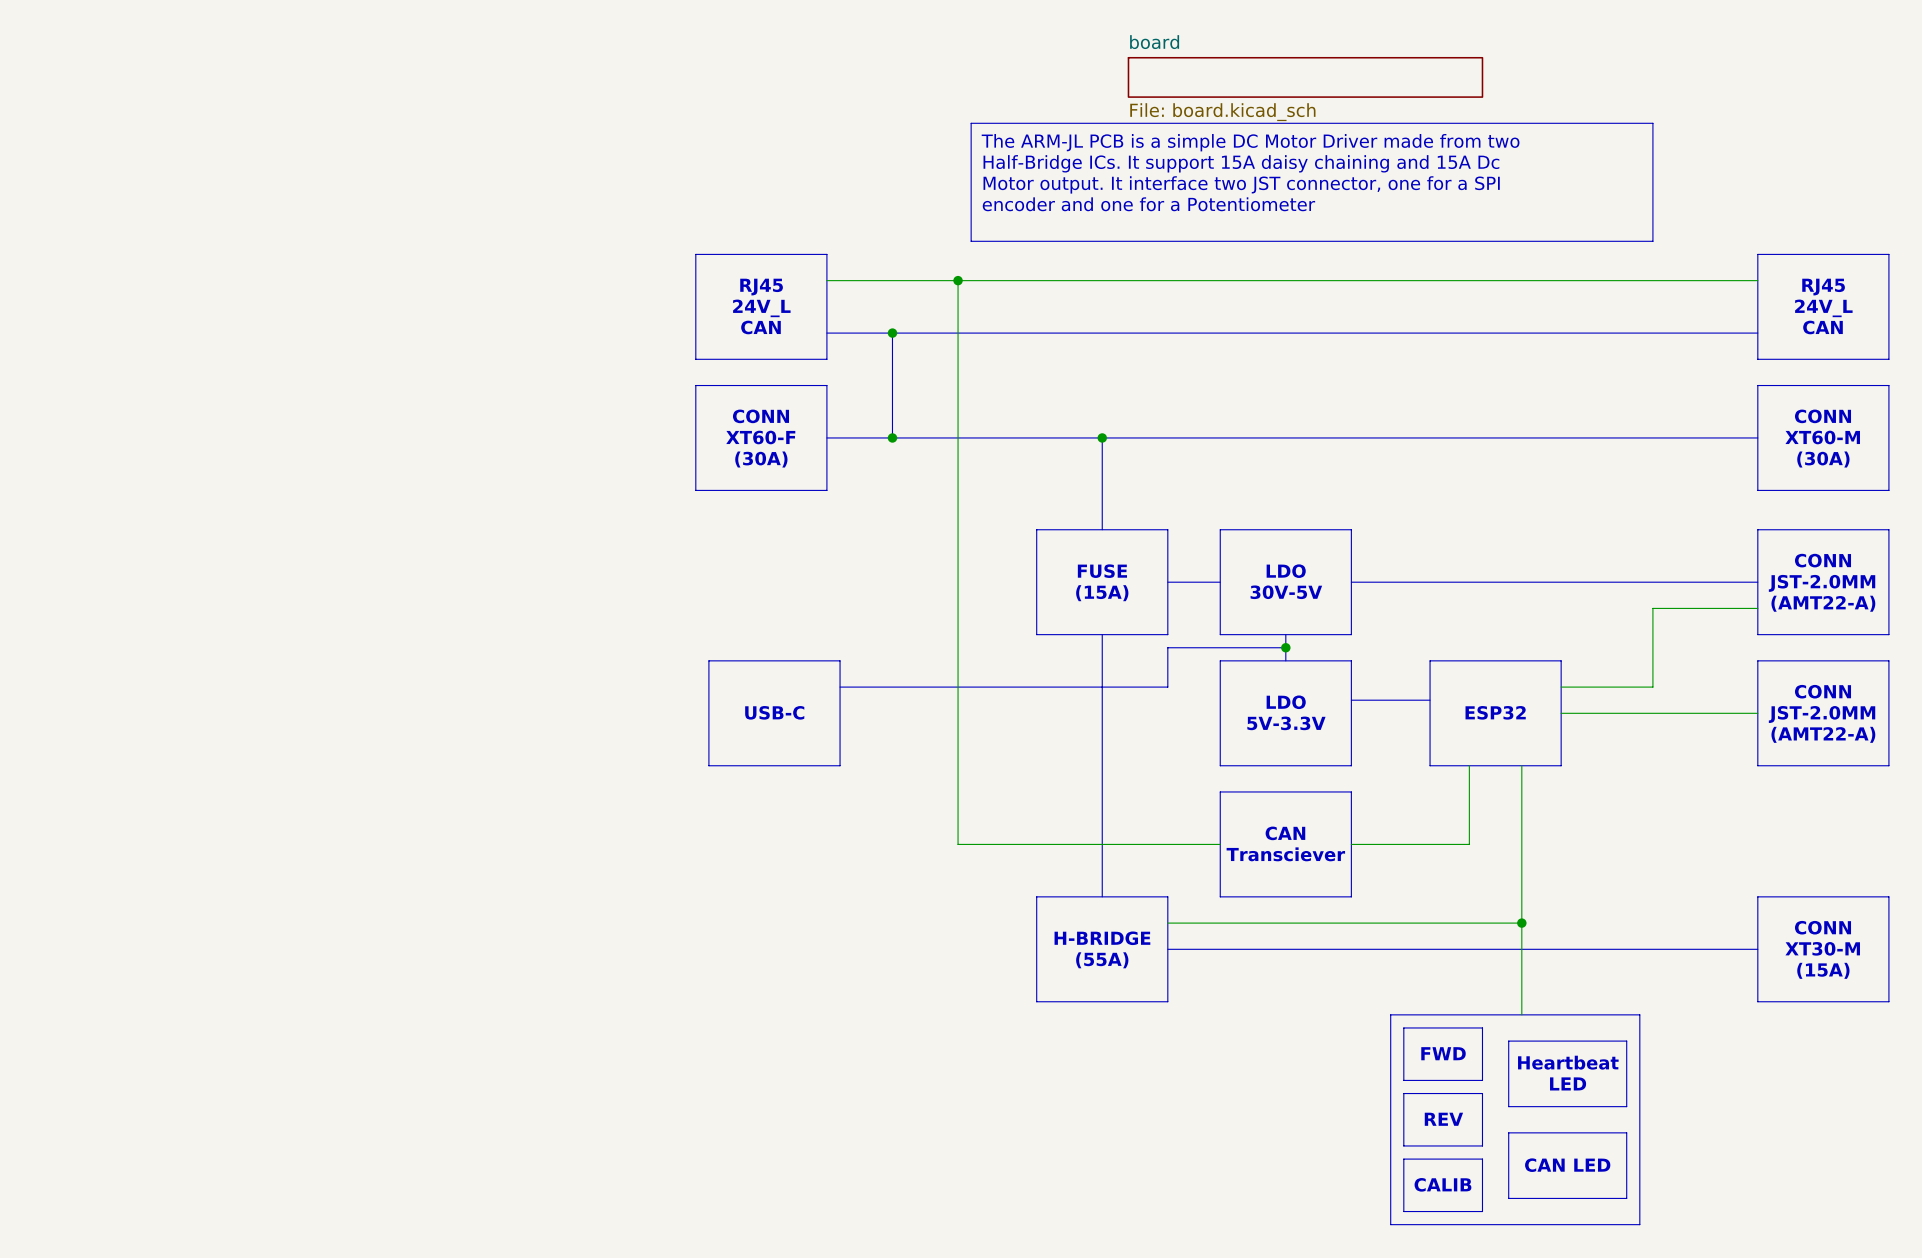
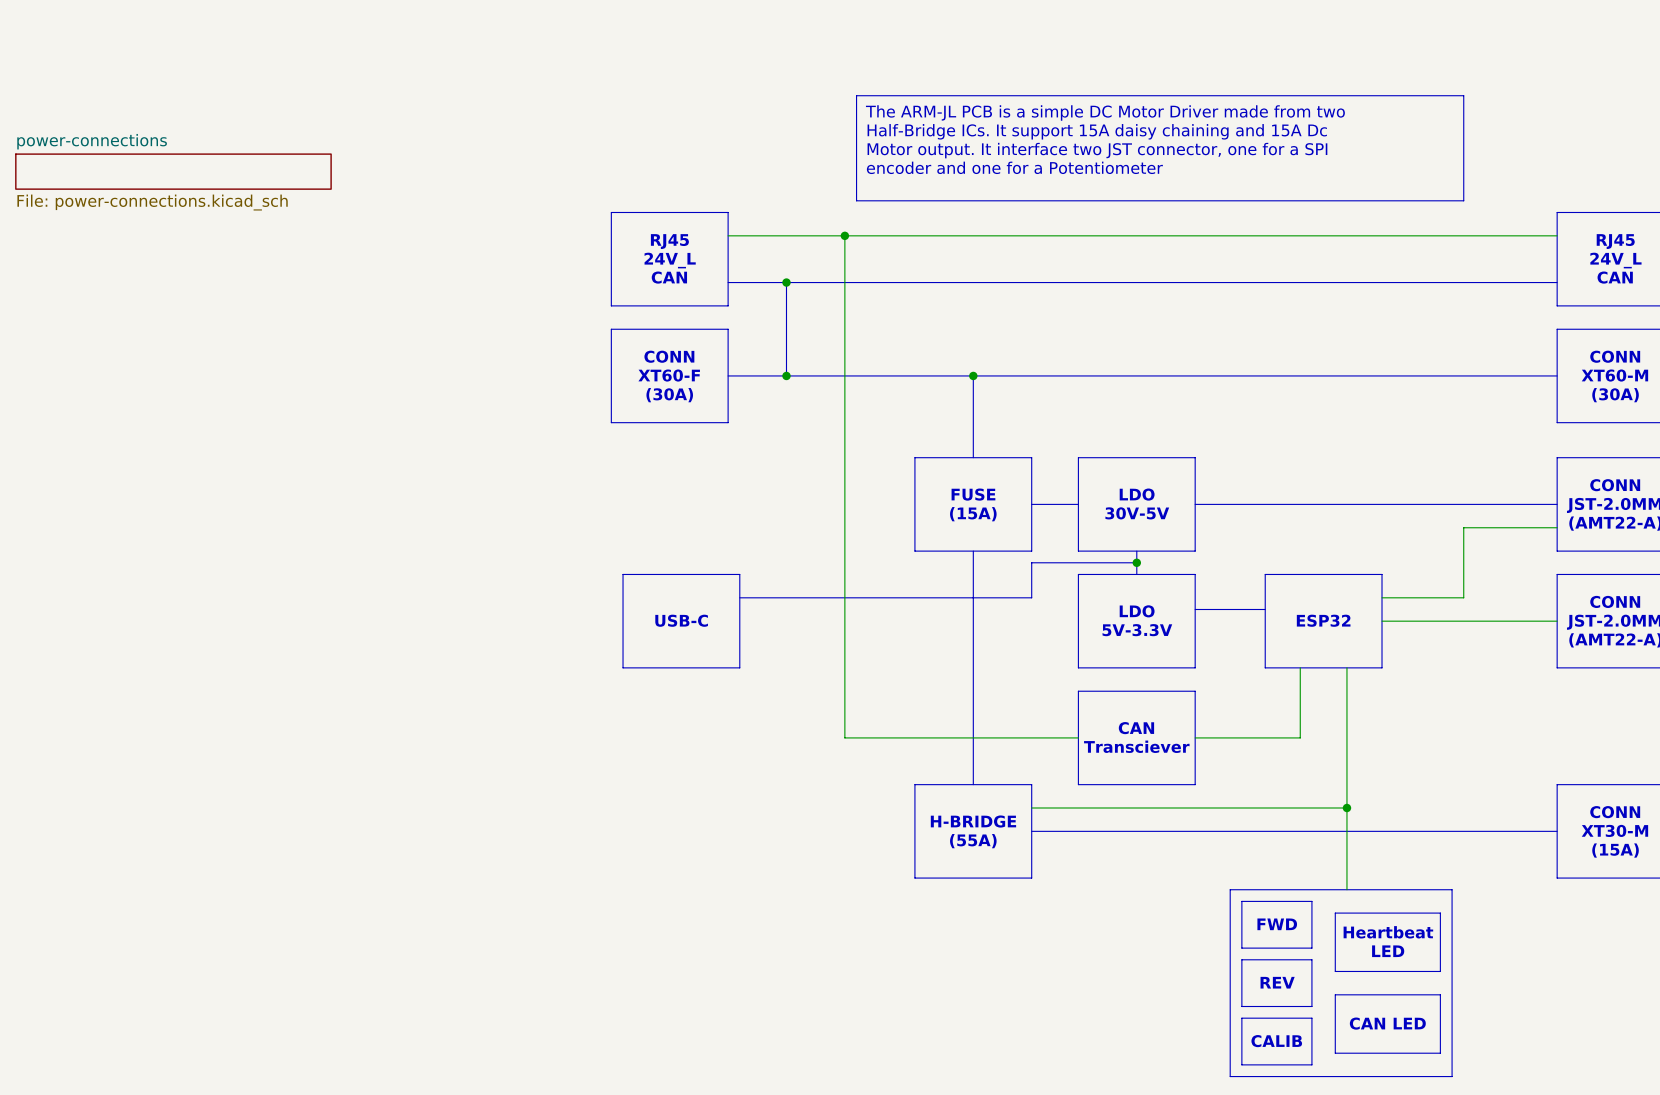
sheet board: File: board.kicad_sch (1305, 77) -> none
sheet power-connections: none -> File: power-connections.kicad_sch (173, 171)

